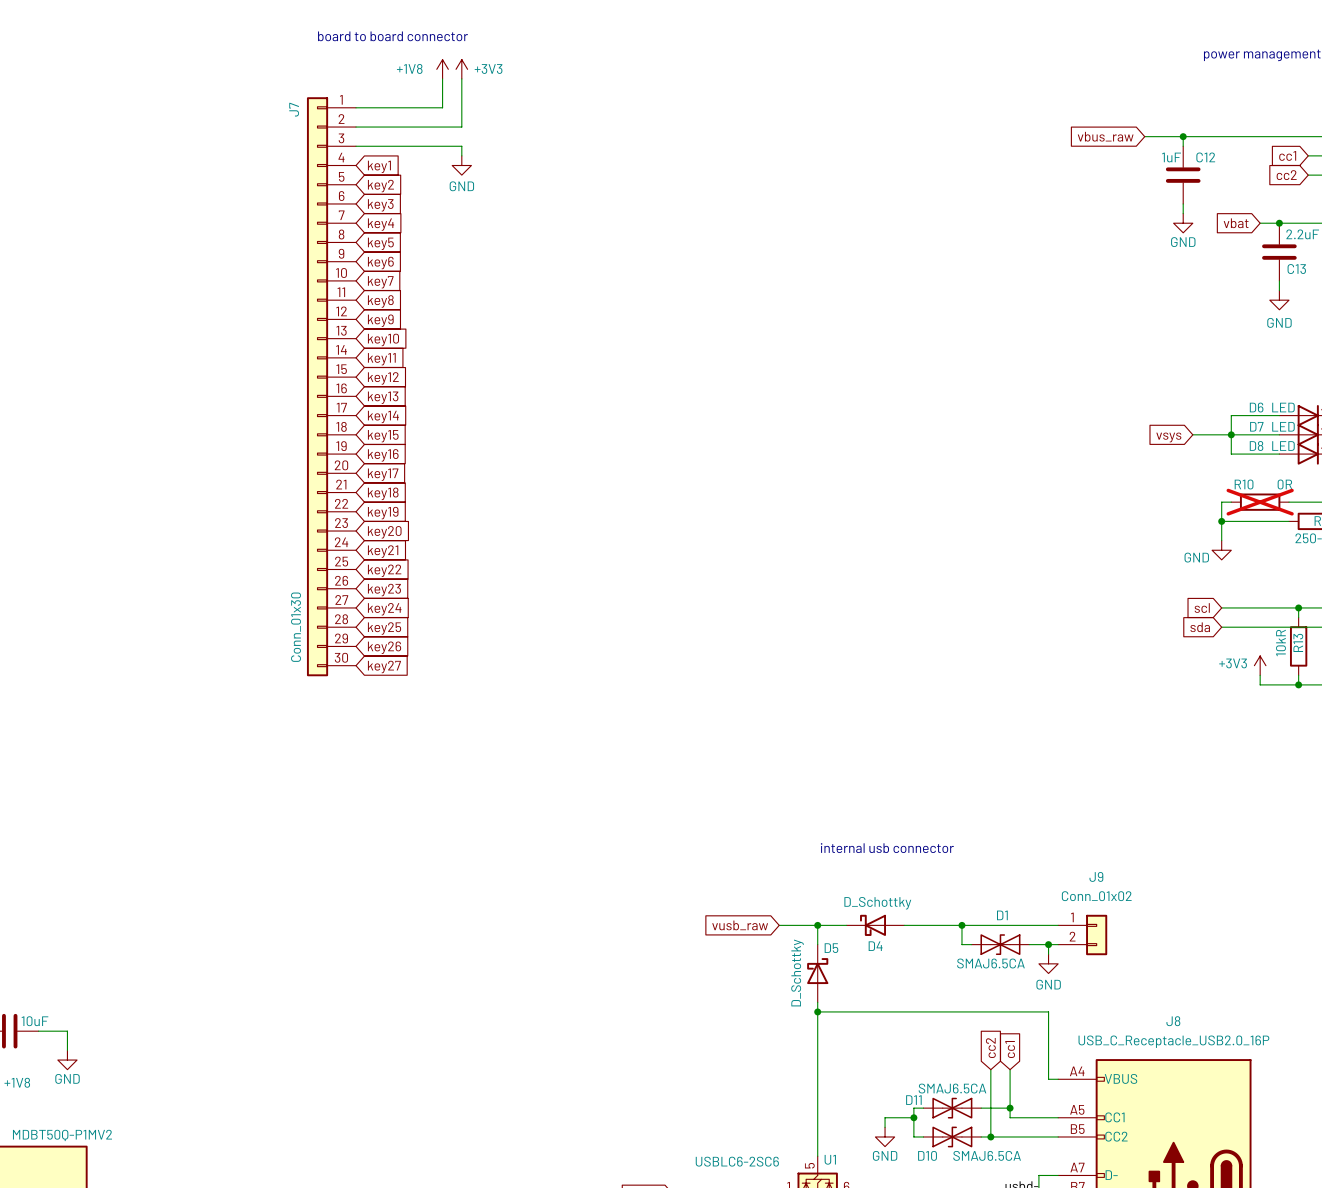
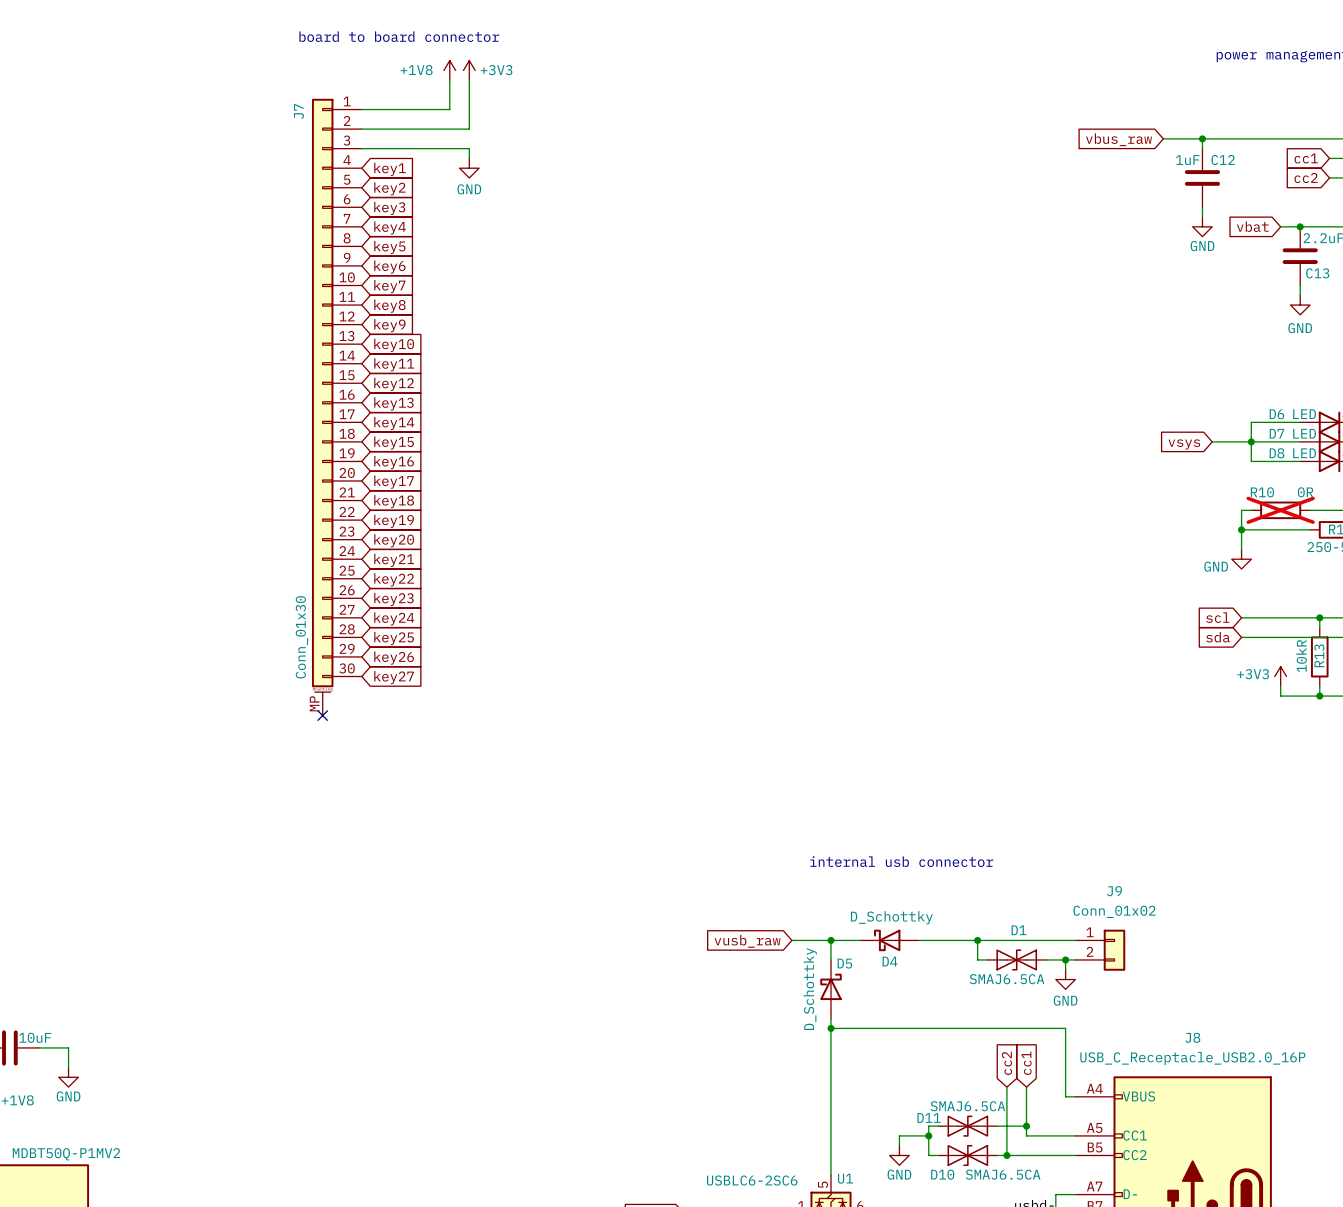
J7 symbol: [306, 97, 357, 677] -> [311, 98, 362, 716]
no-connect mark: none -> (322, 715)

